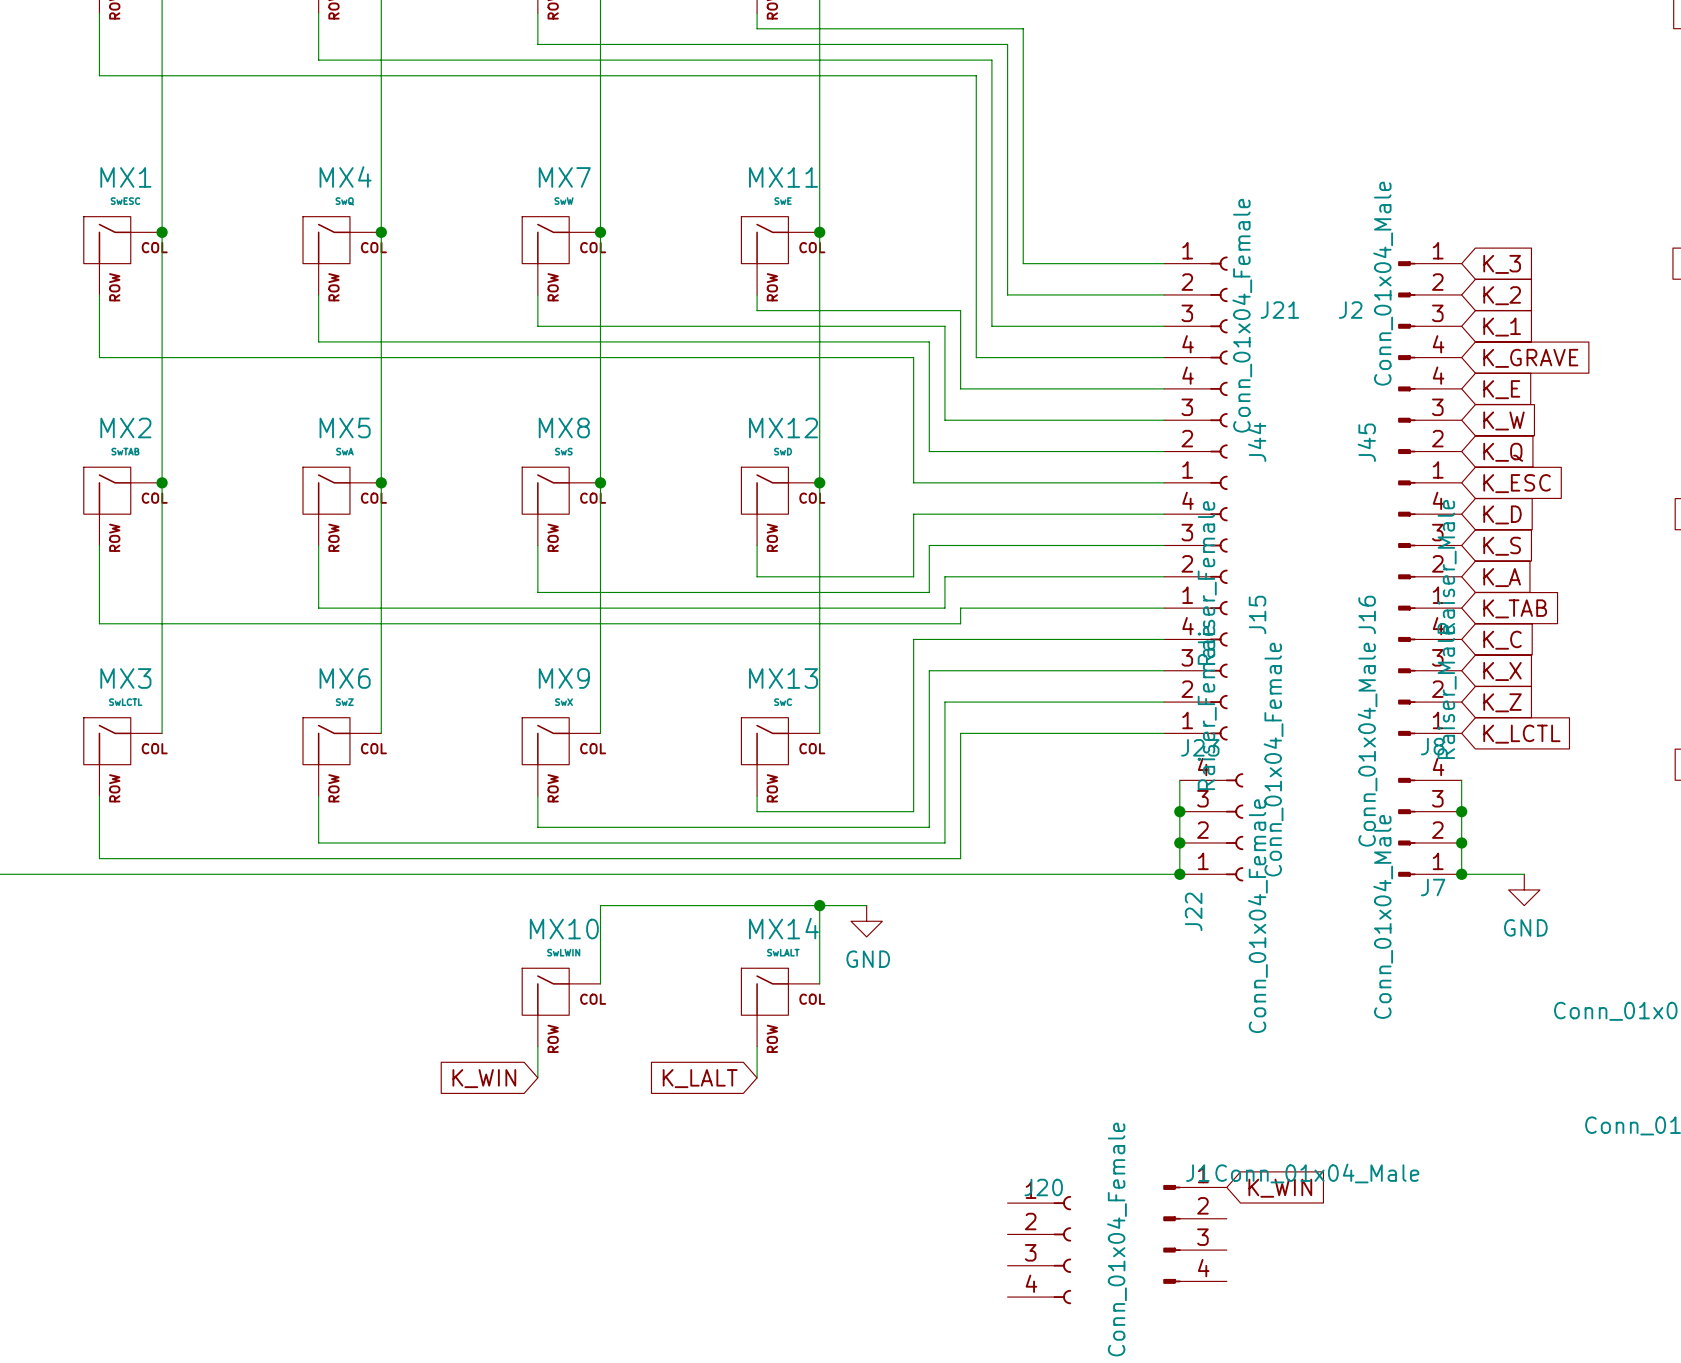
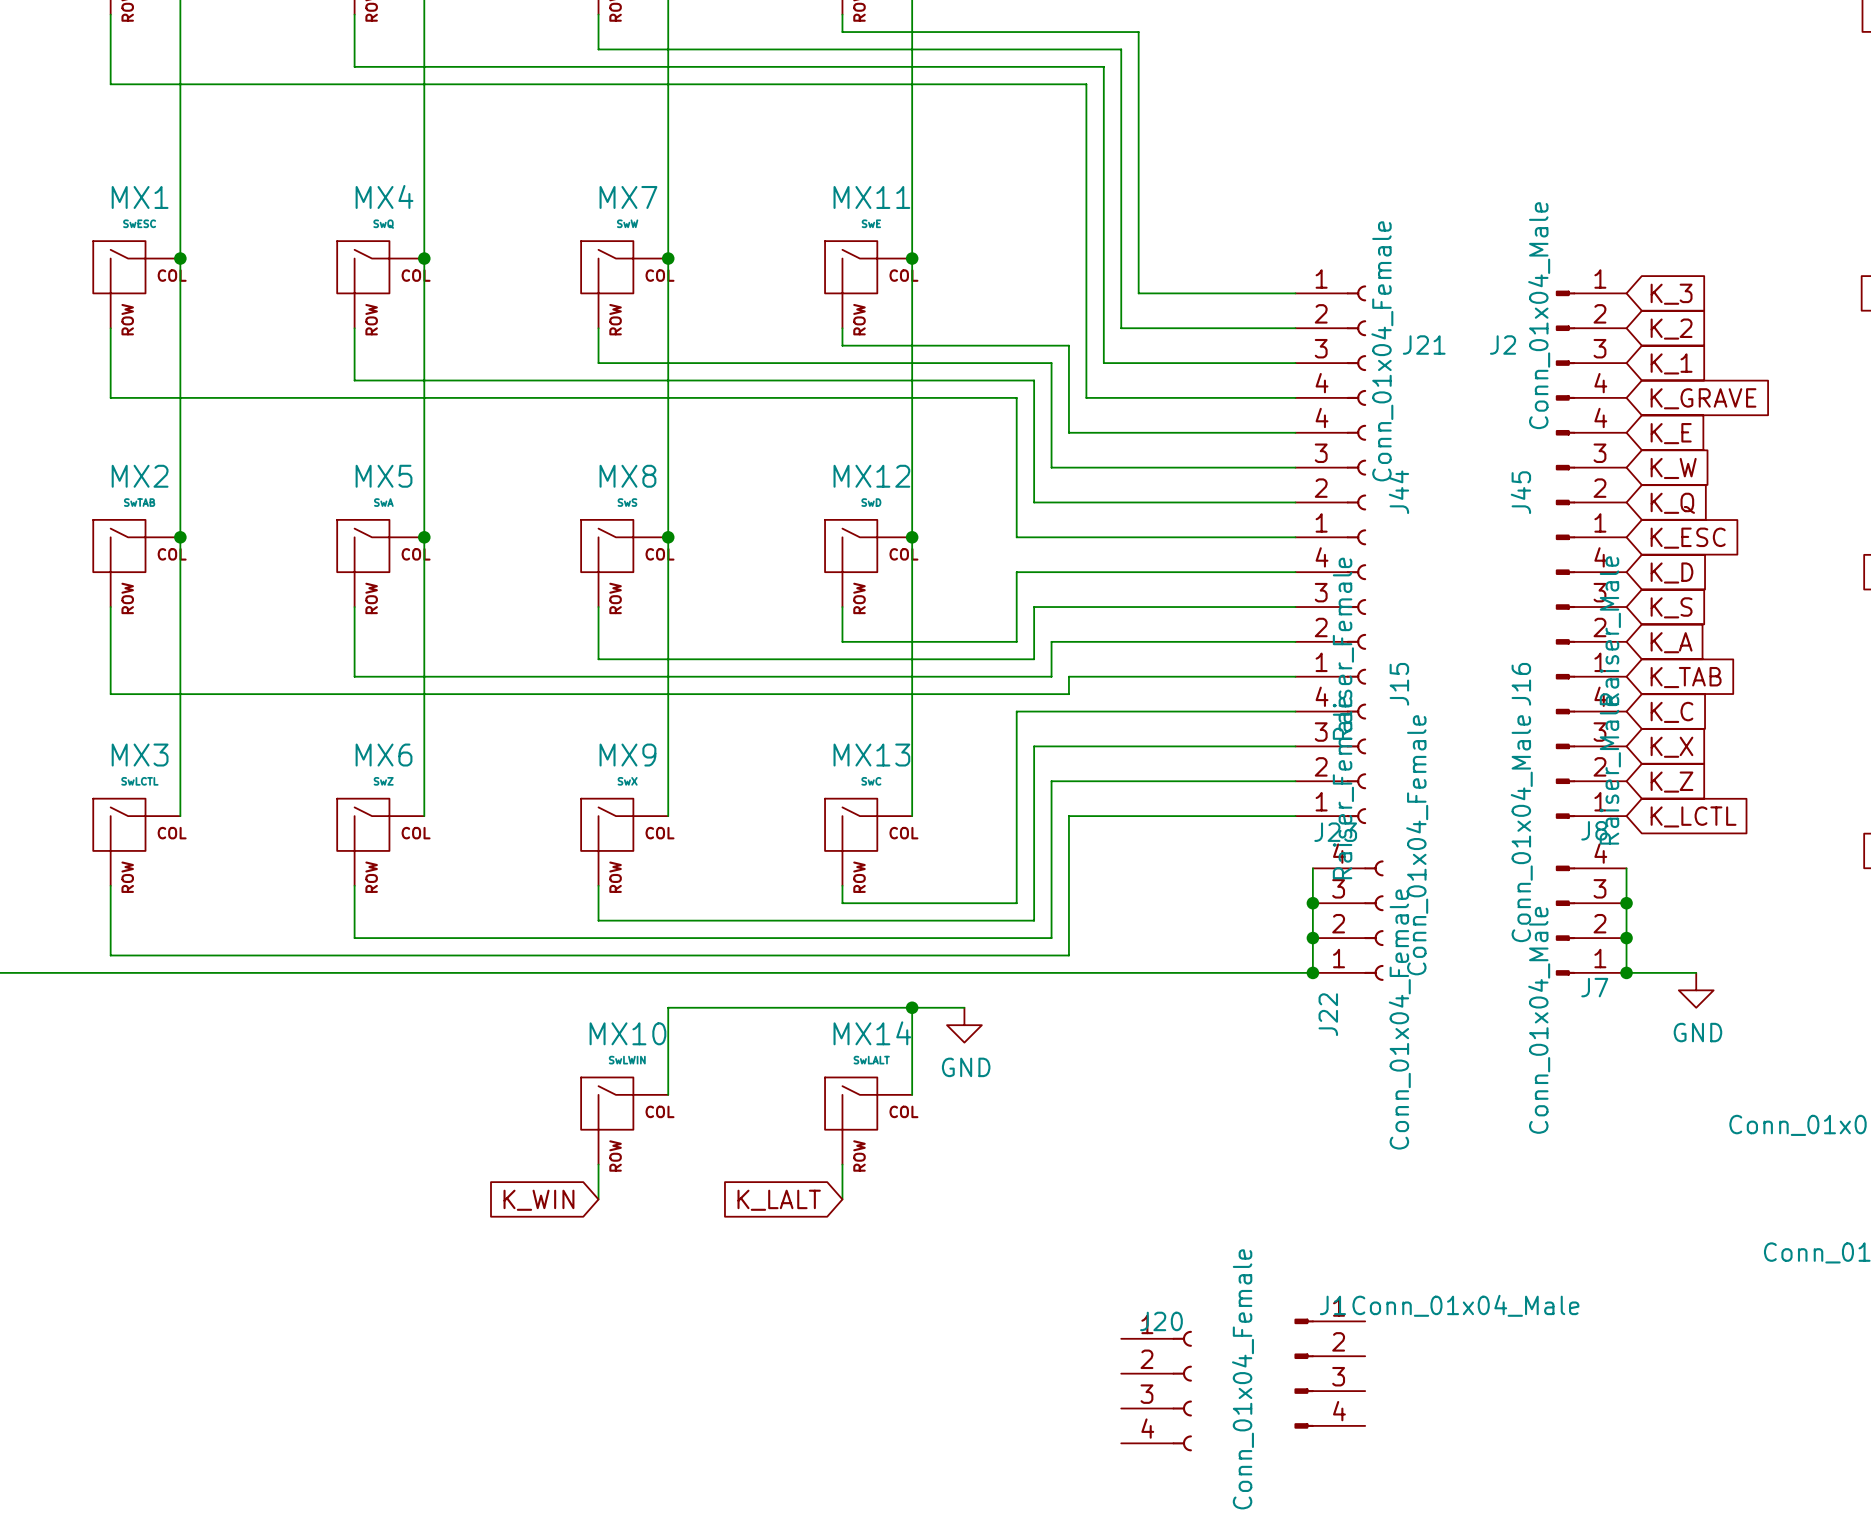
global label: K_WIN (1280, 1188) -> none

